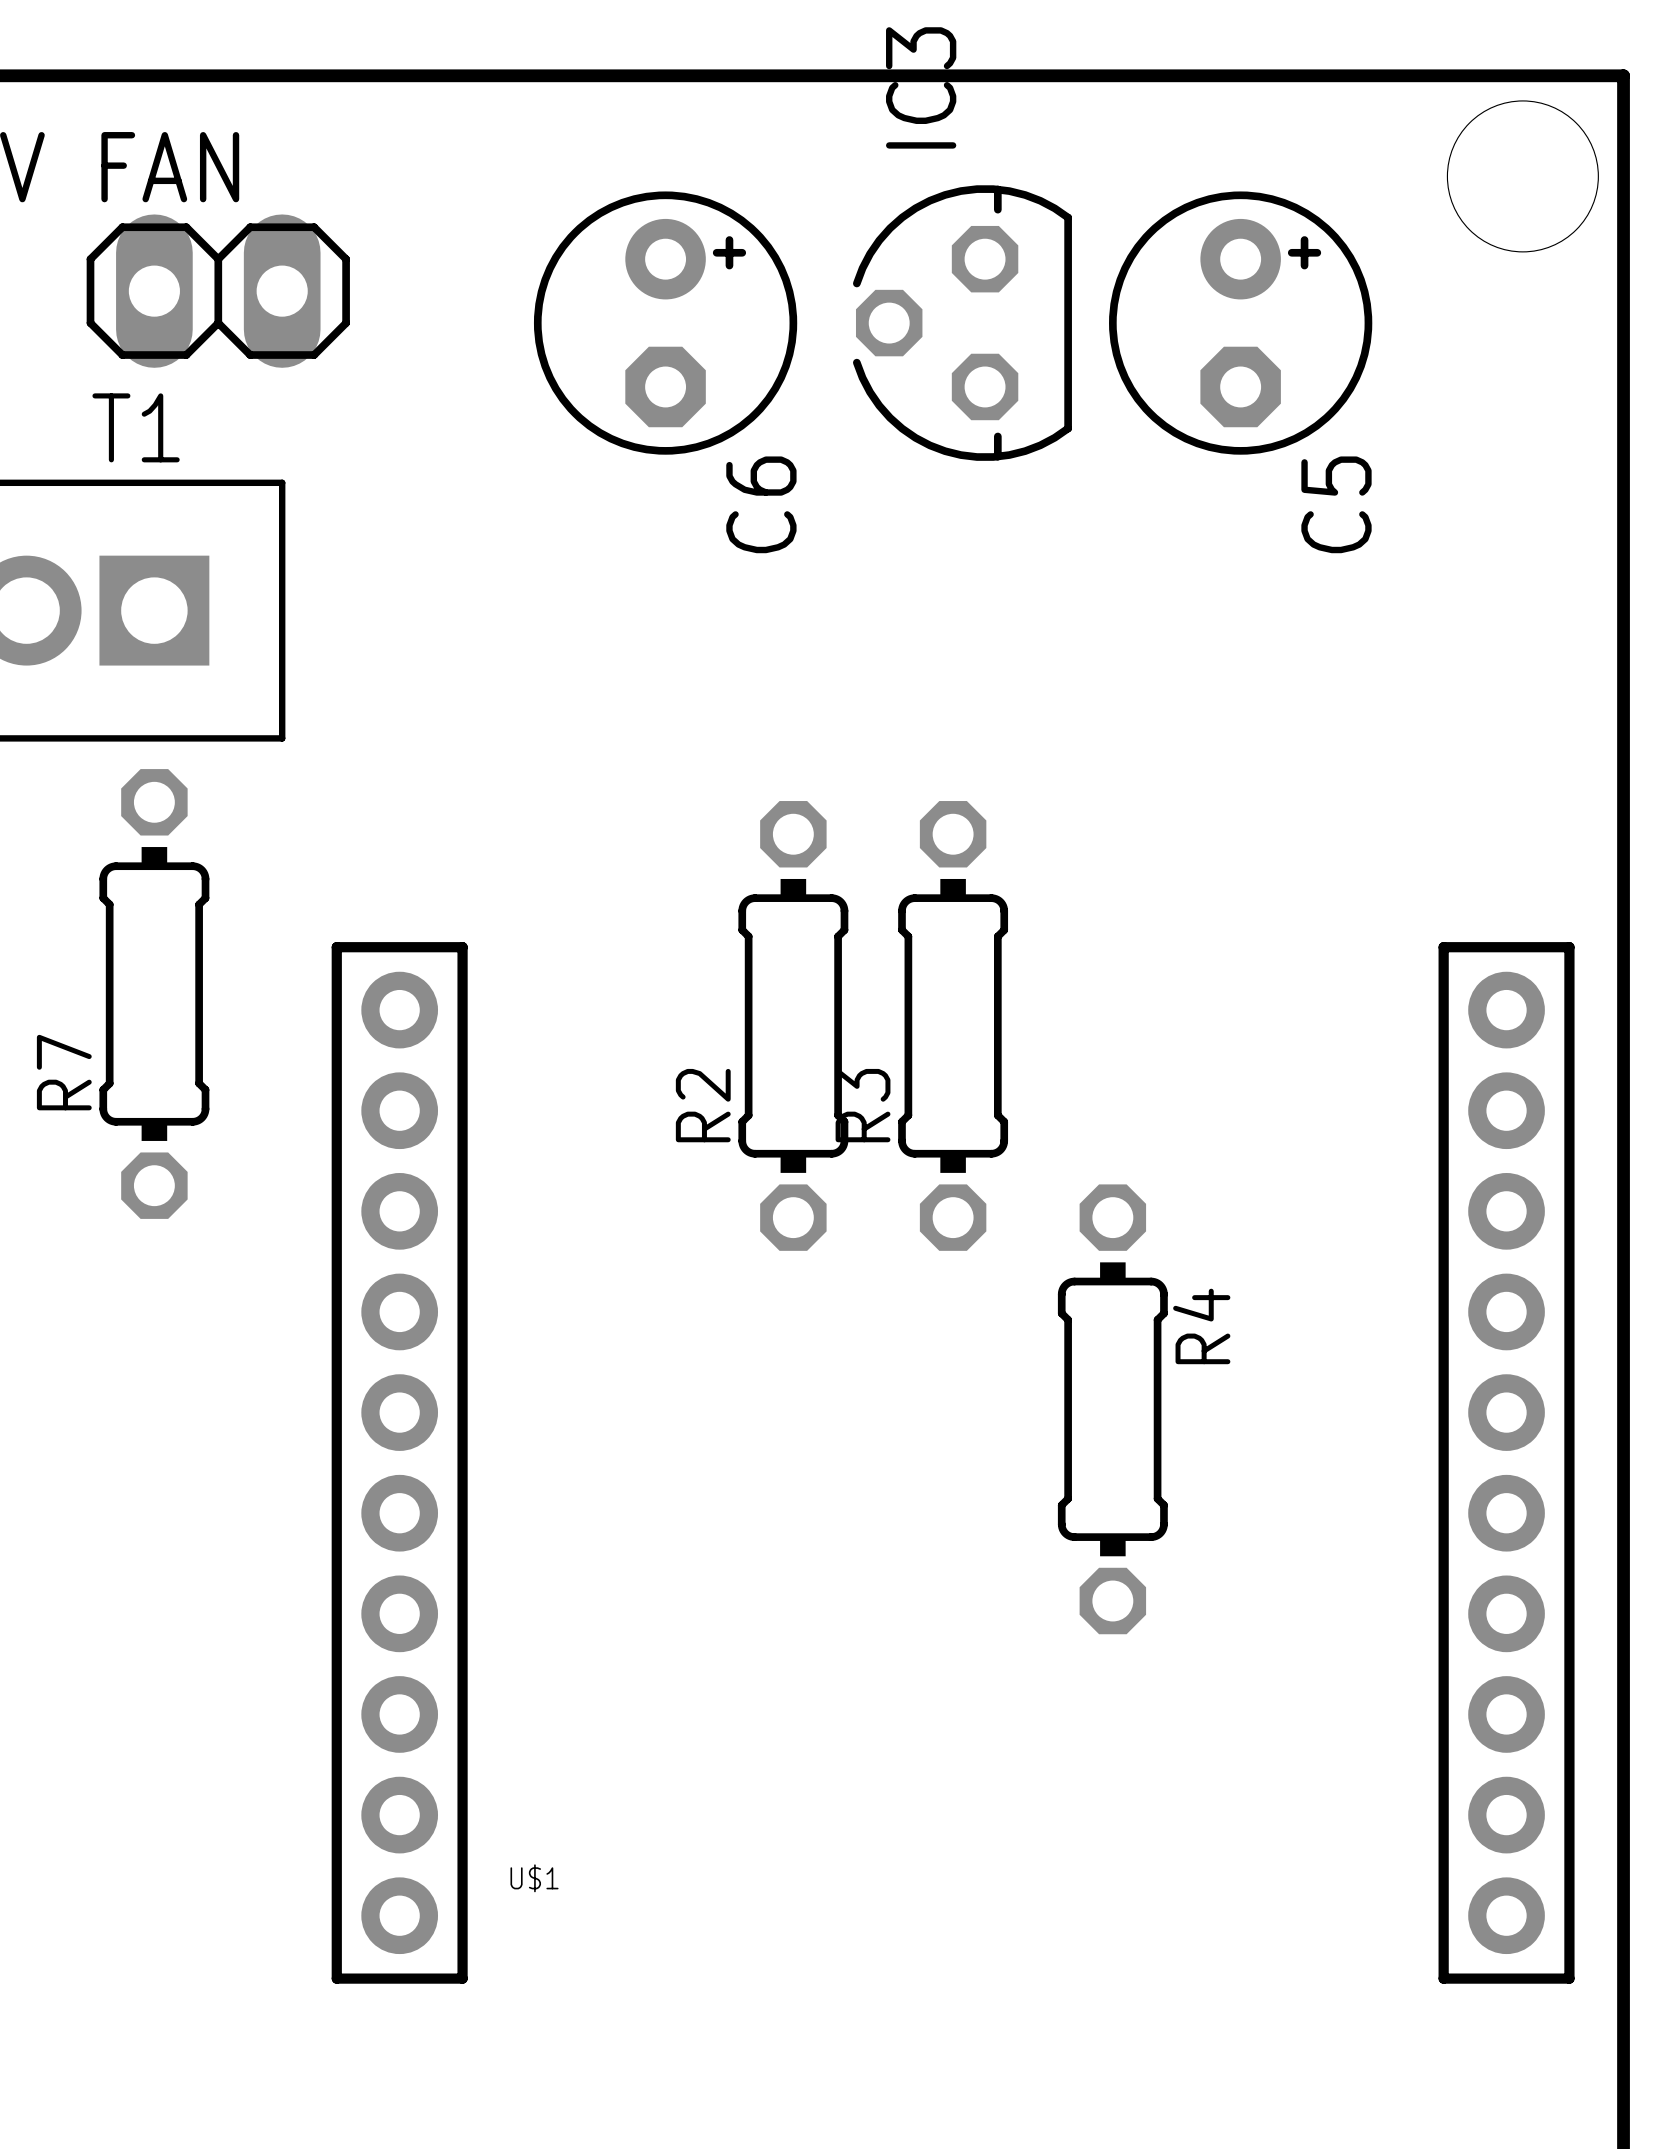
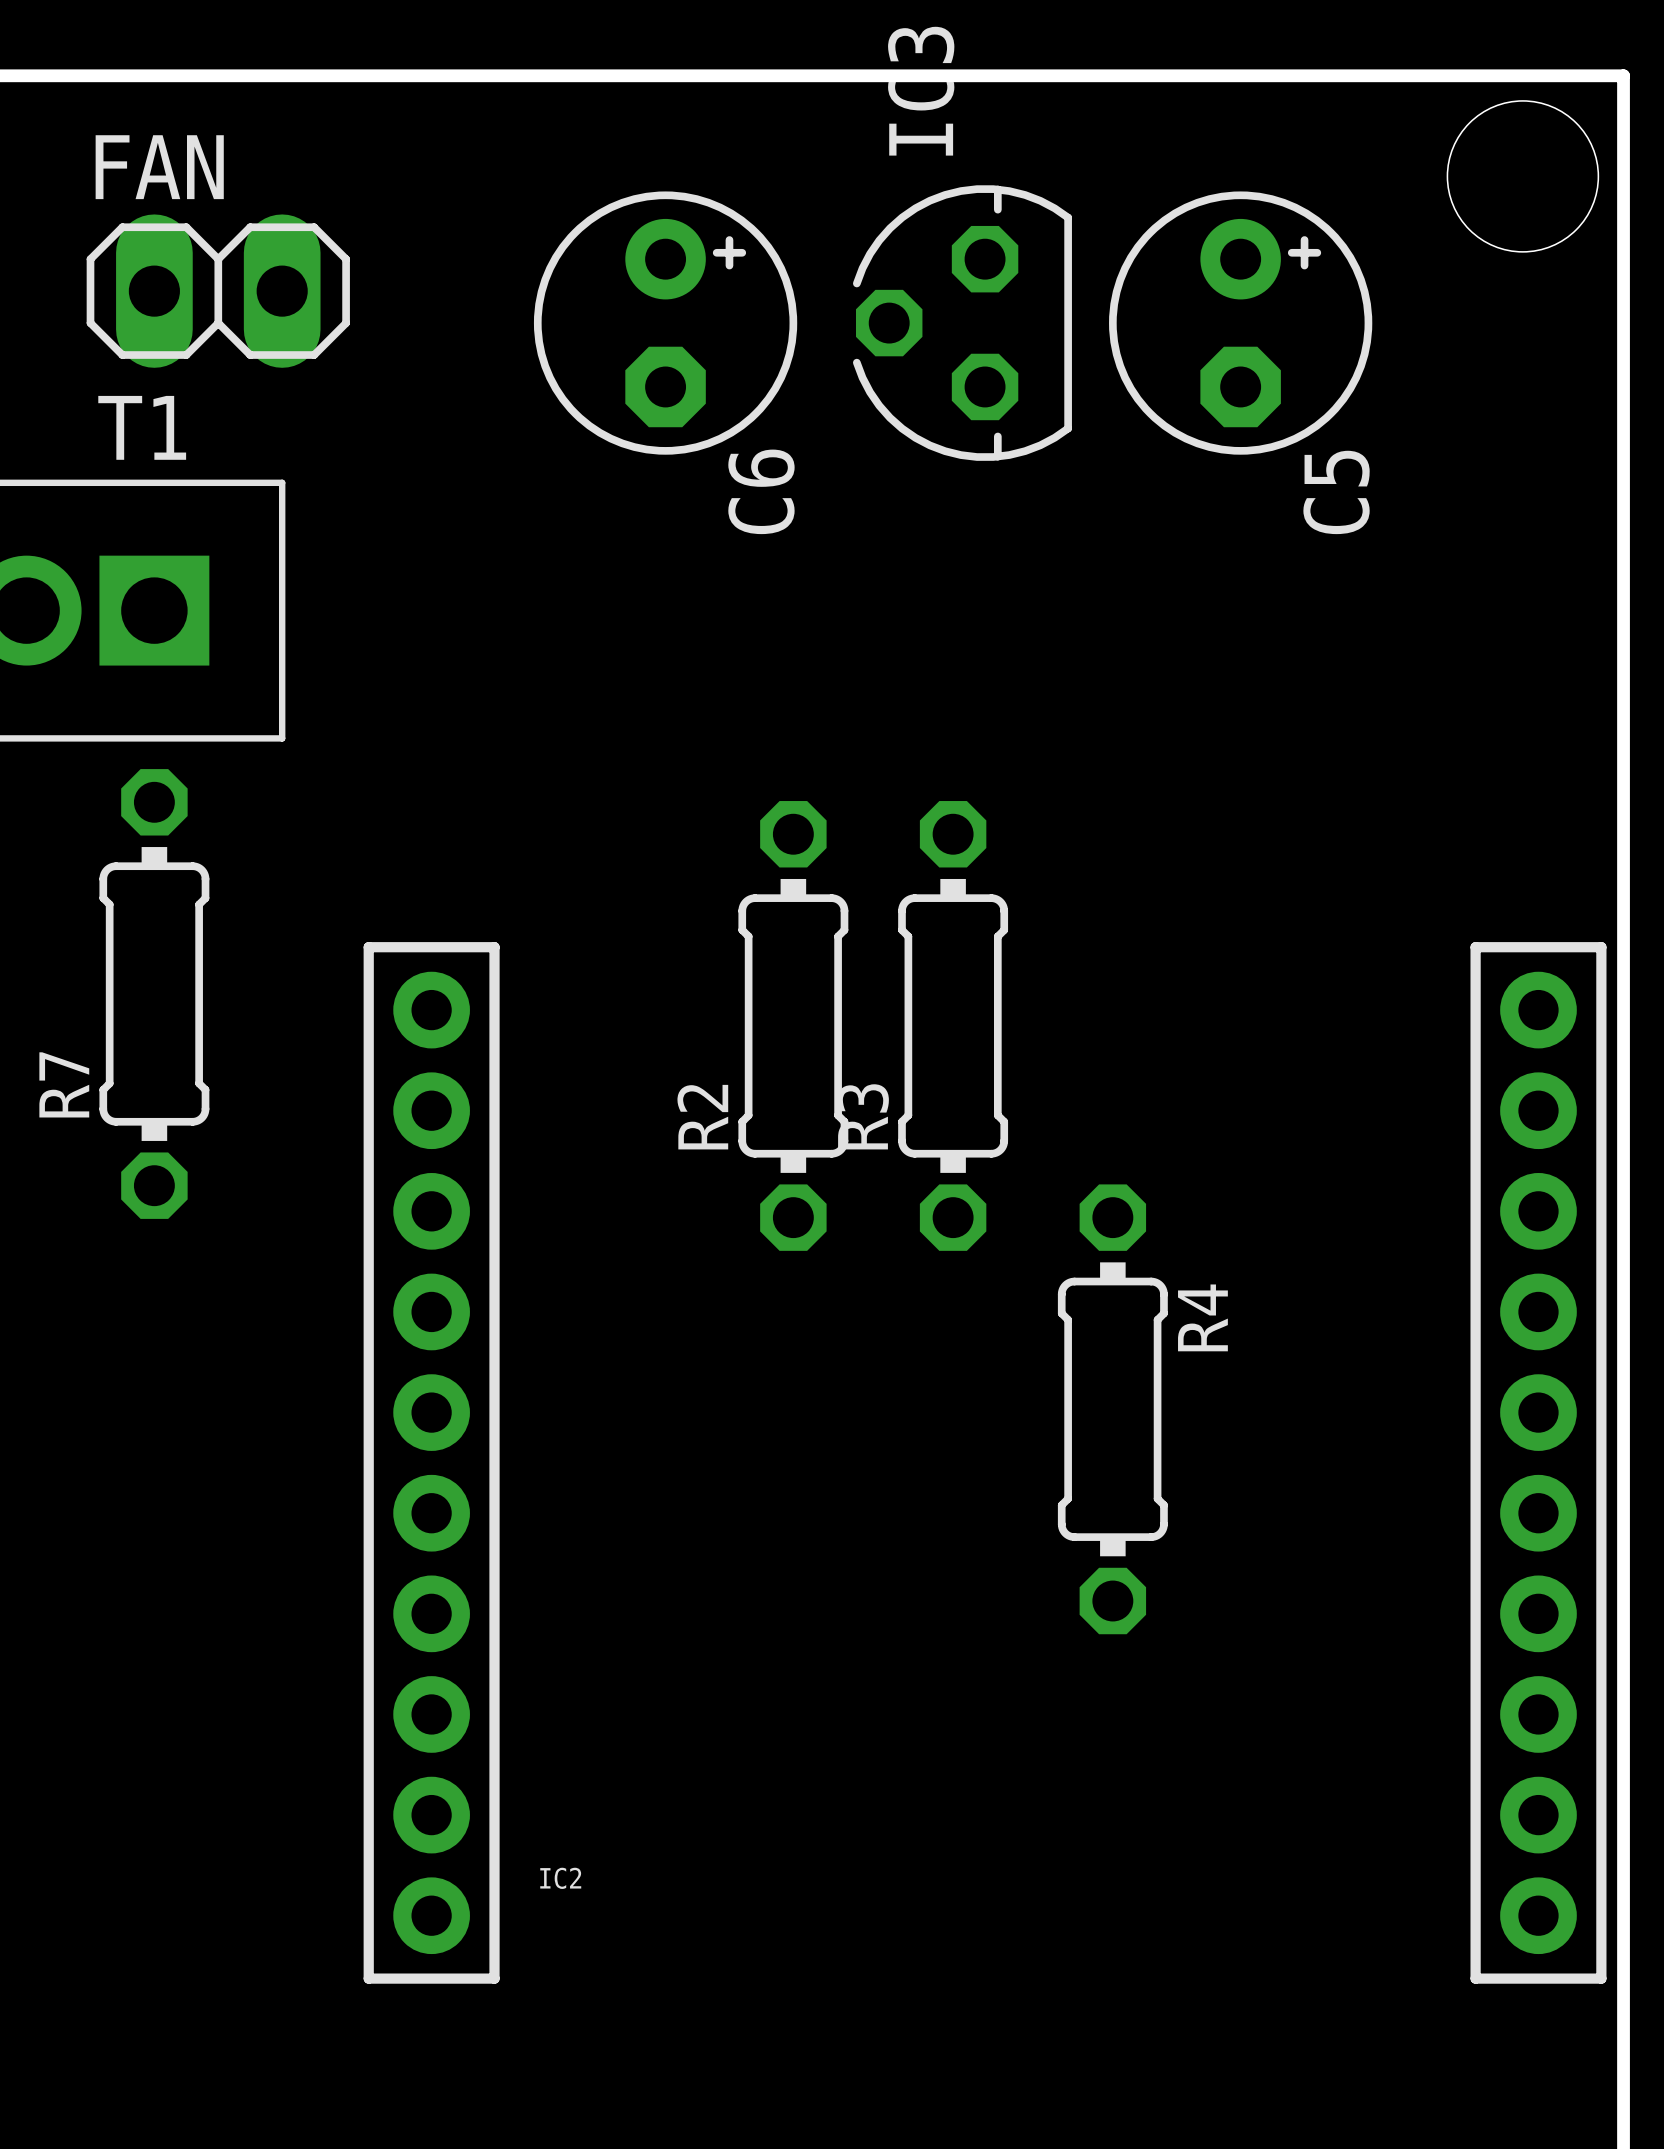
U$1 position: (953, 1462) -> (985, 1462)
U$1 name: U$1 (534, 1878) -> IC2 (560, 1878)

